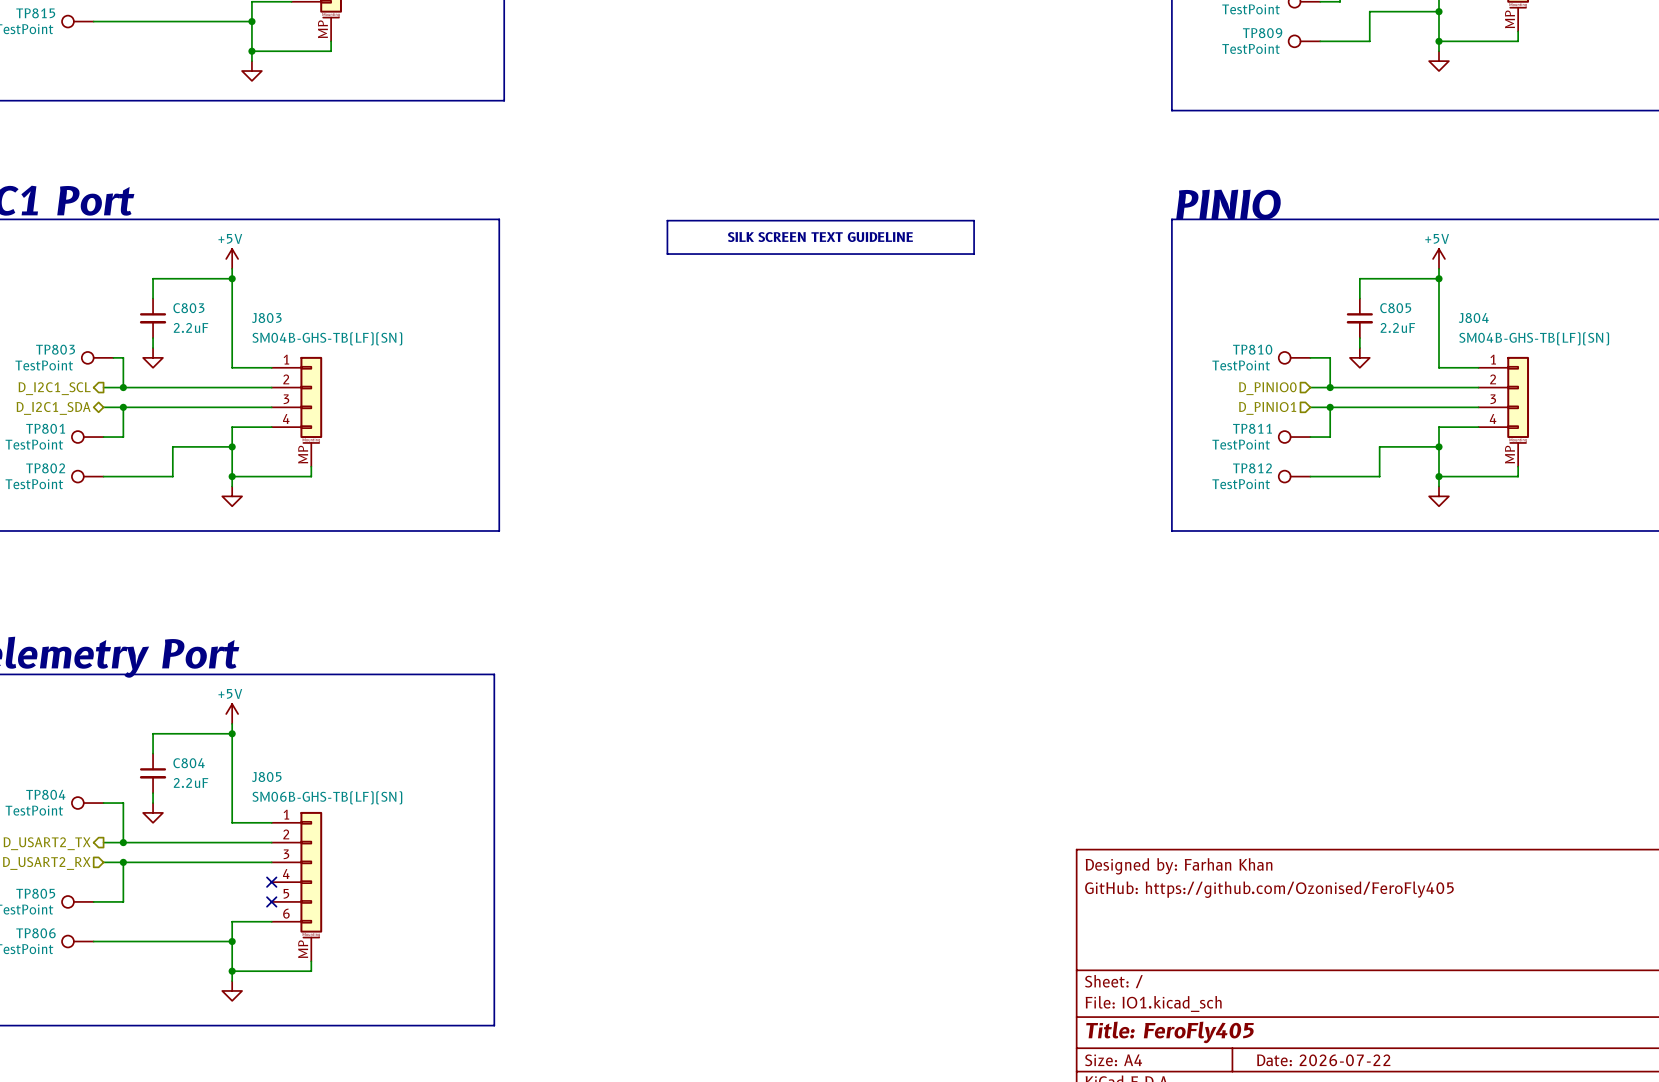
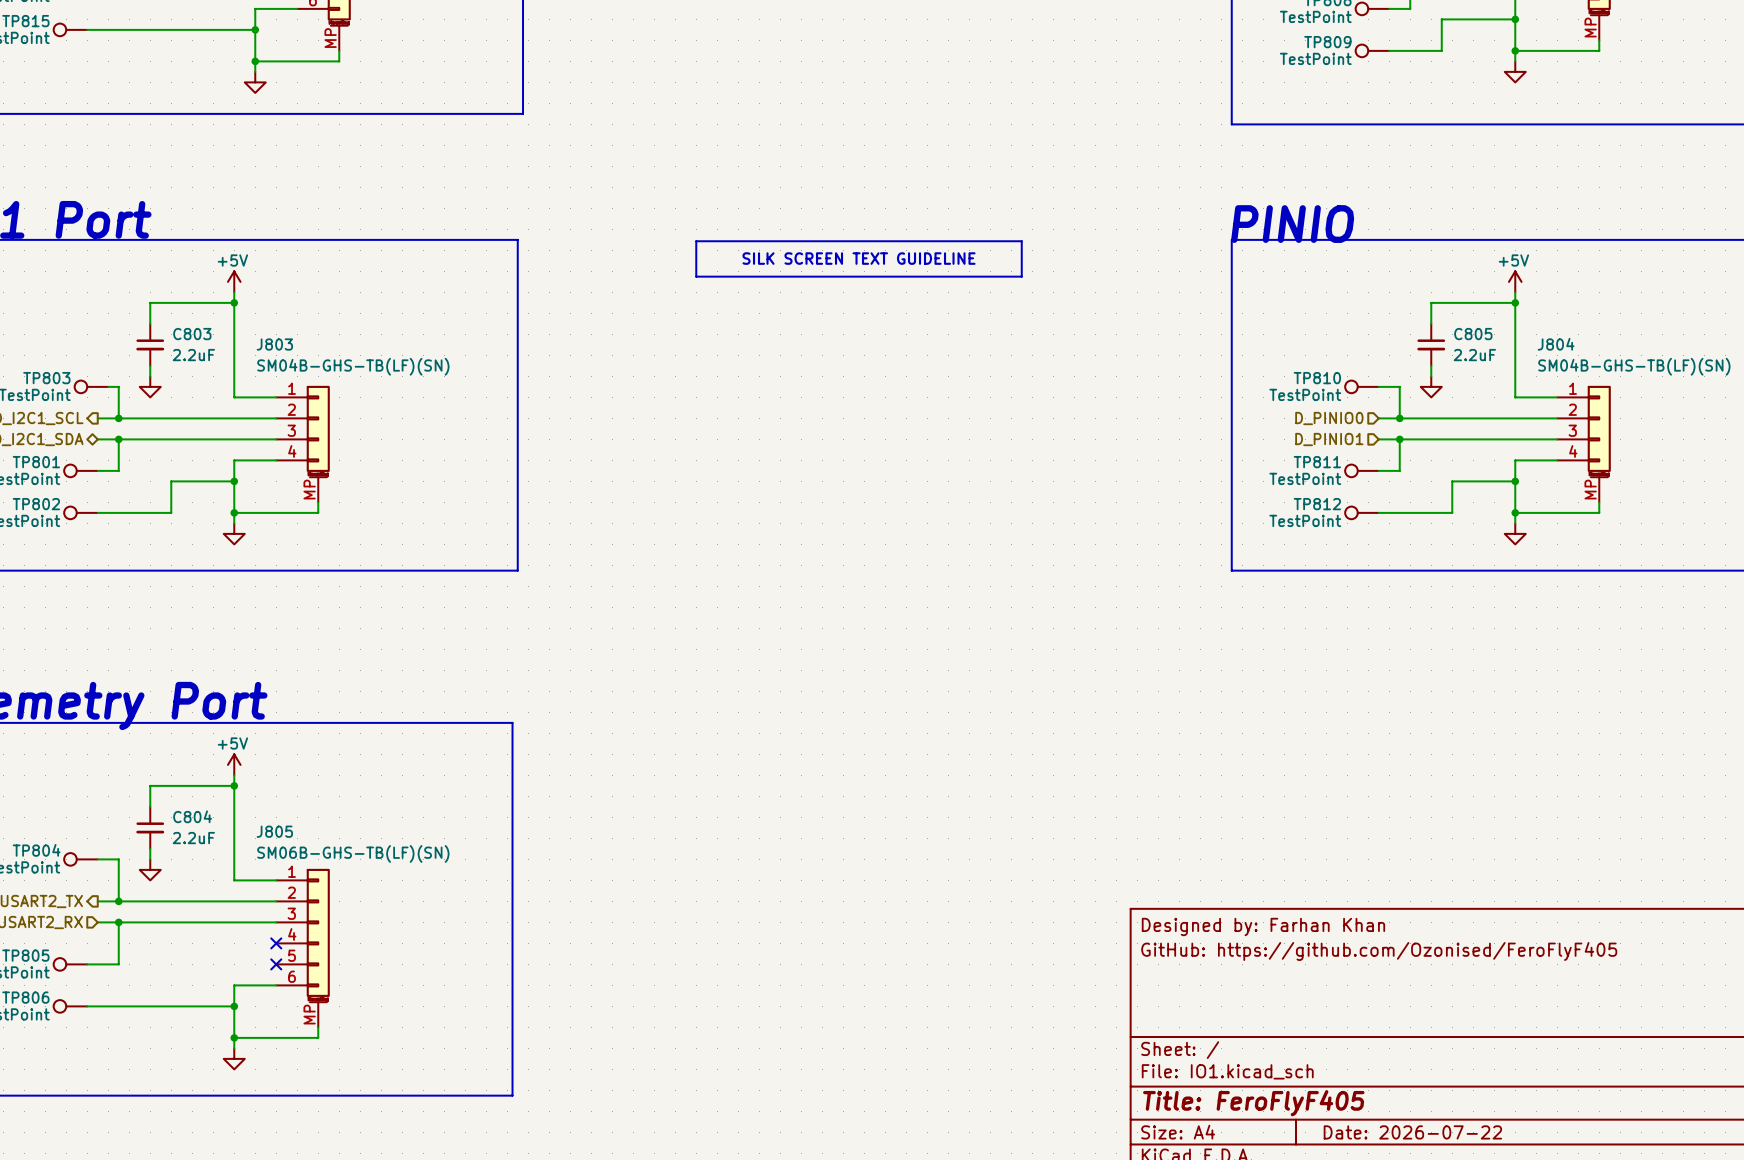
title block: GitHub: https://github.com/Ozonised/FeroFly405 (1269, 889) -> GitHub: https://github.com/Ozonised/FeroFlyF405 (1379, 951)
title block: Title: FeroFly405 (1169, 1032) -> Title: FeroFlyF405 (1253, 1103)

